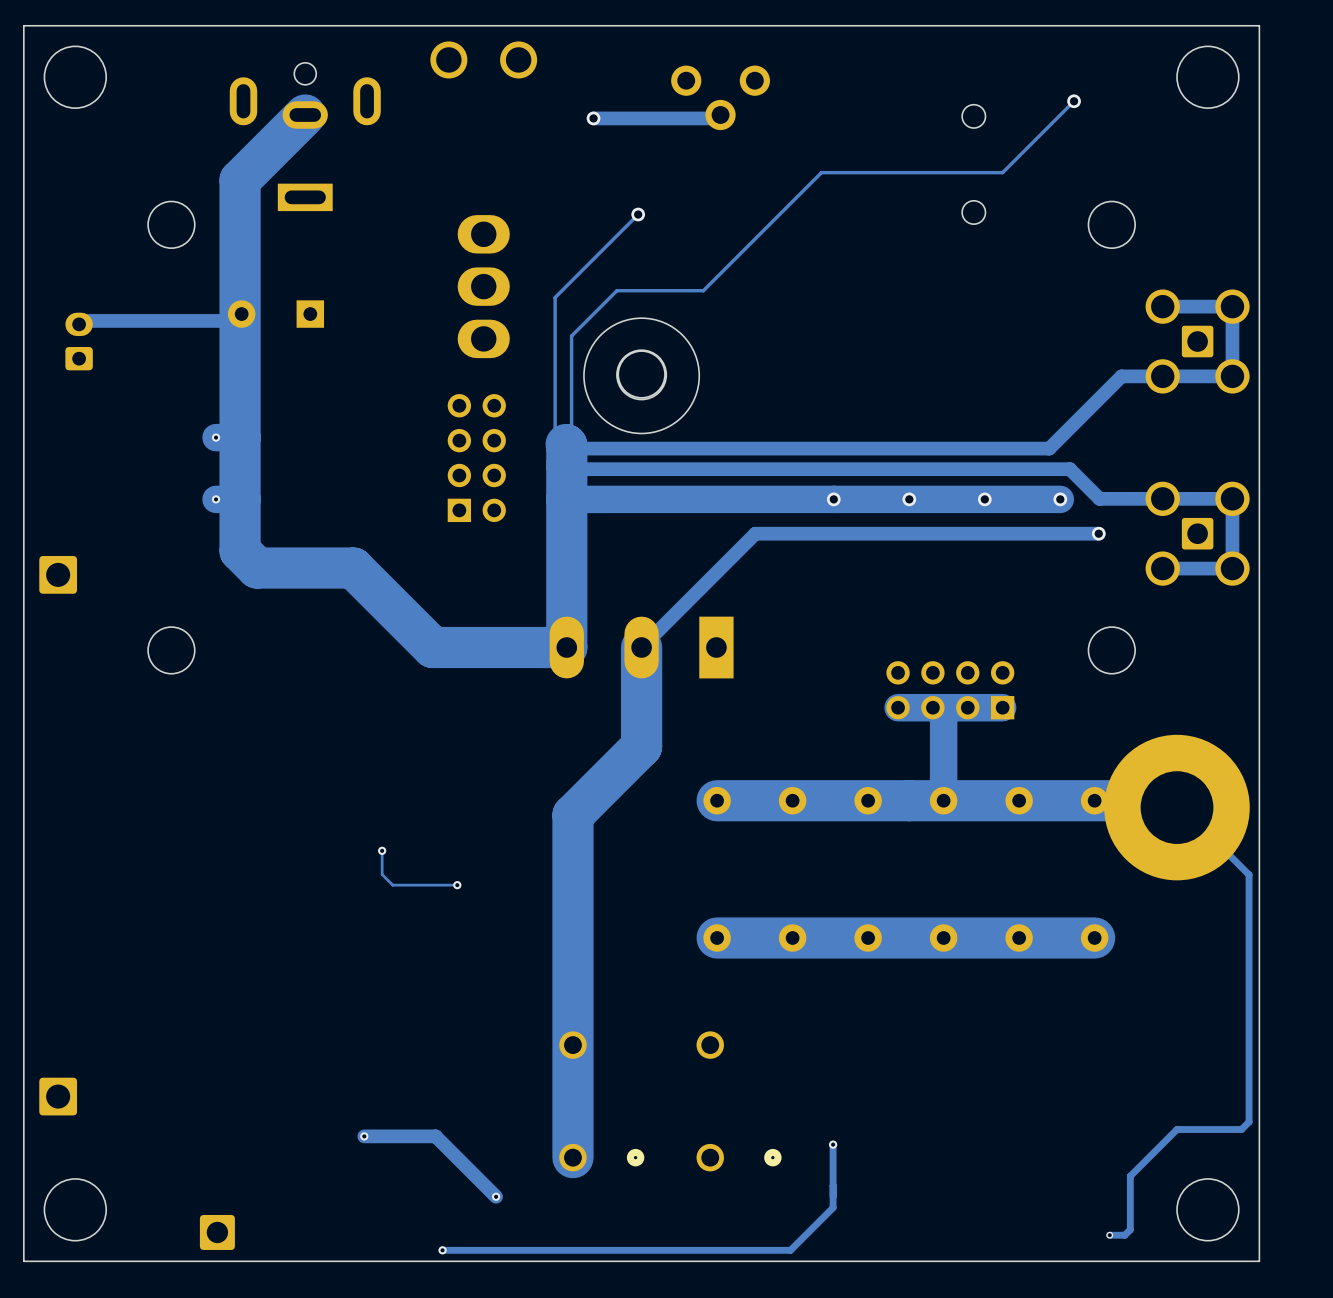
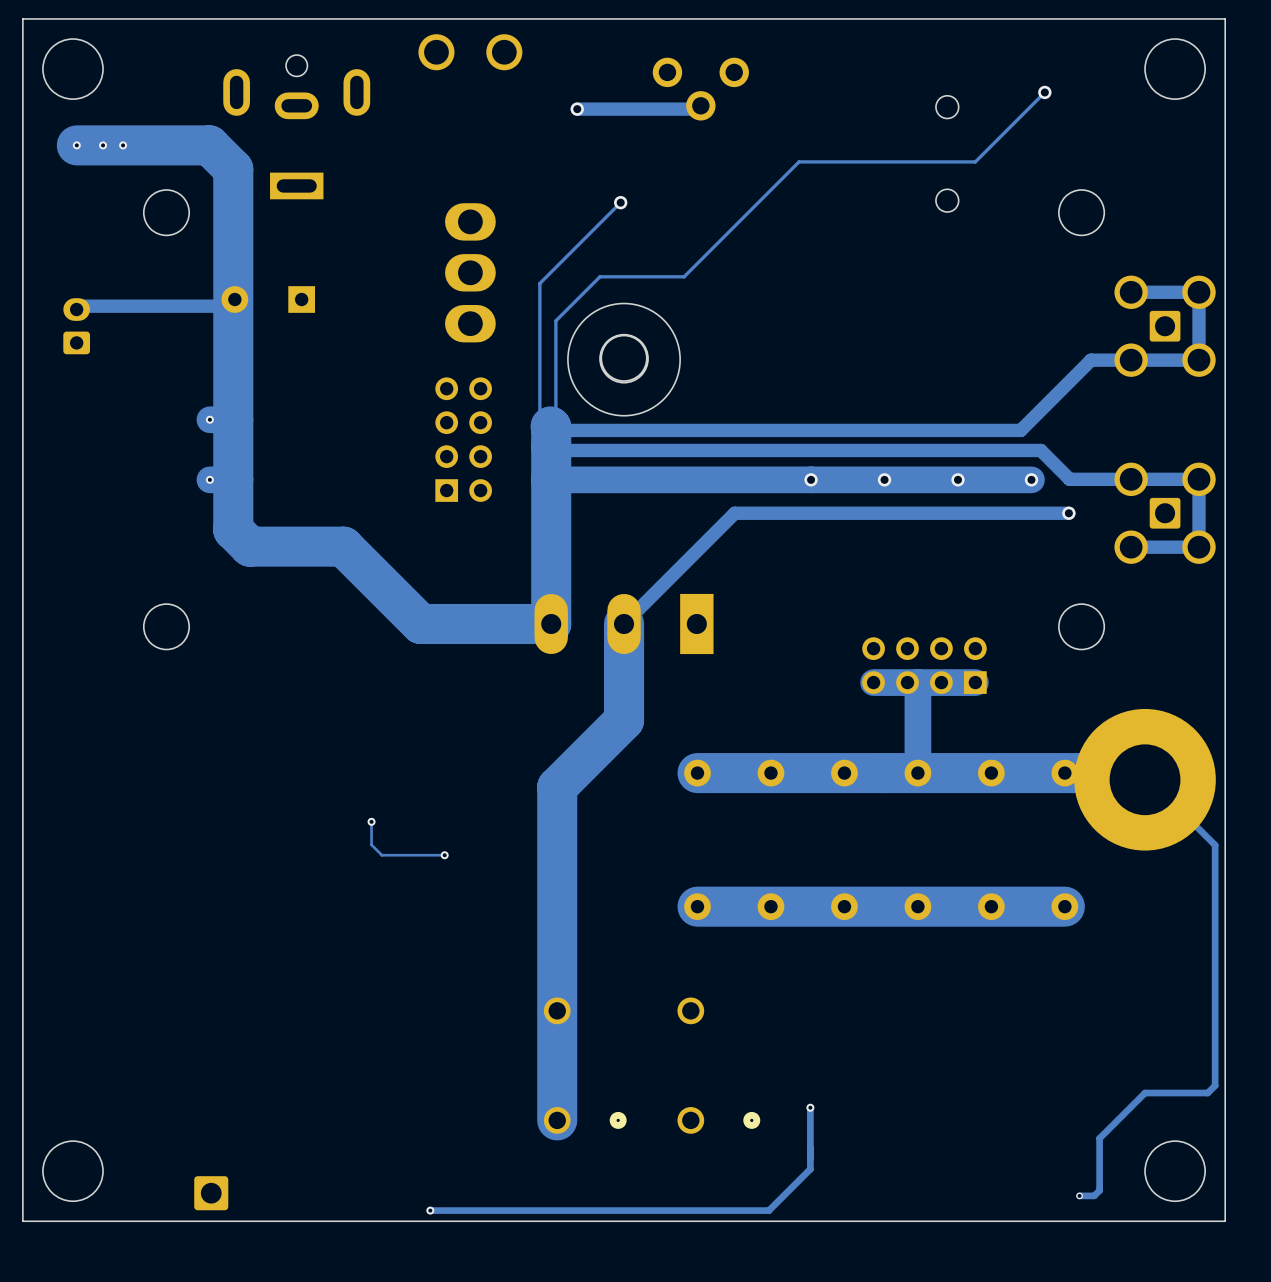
track: (305, 115) (240, 180) -> (76, 145) (209, 145) (233, 169)
via: none -> (76, 145)
via: none -> (103, 145)
via: none -> (123, 145)
part: (58, 574) -> none
part: (58, 1096) -> none
track: (364, 1136) (435, 1136) (496, 1196) -> none
via: (364, 1136) -> none
via: (496, 1196) -> none

